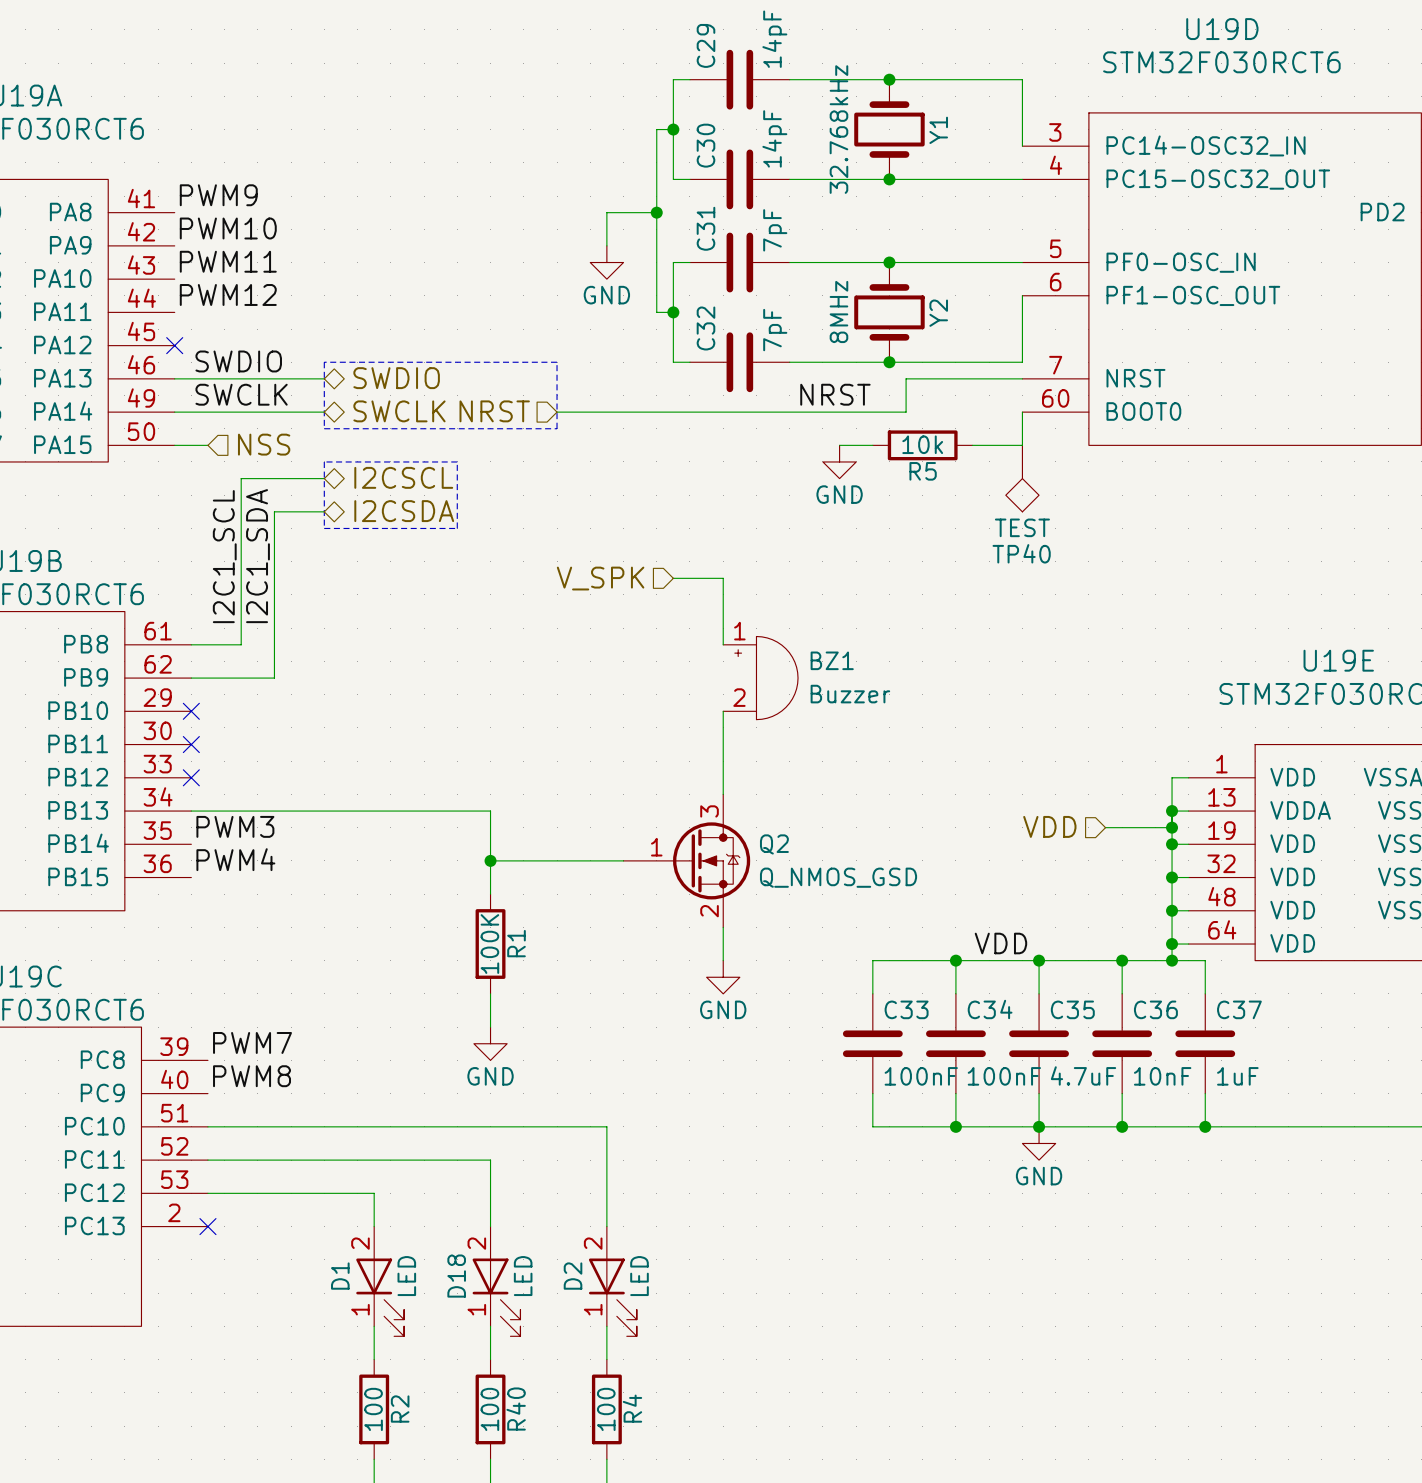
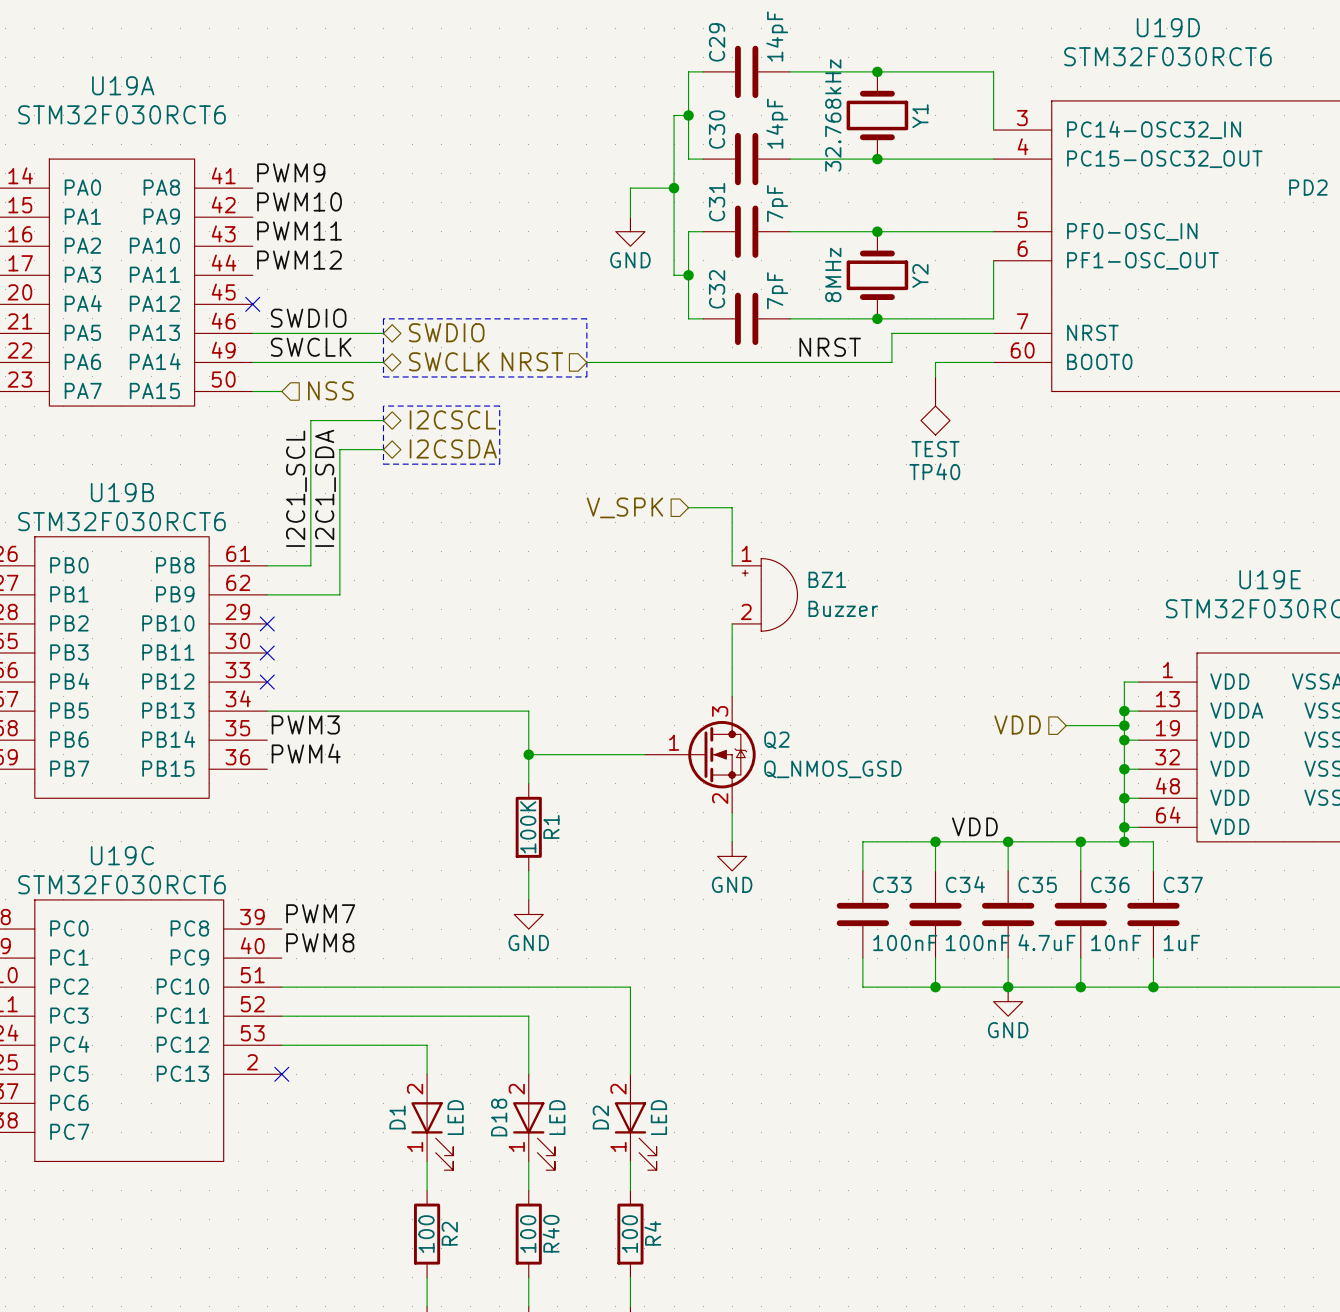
wire: (1022, 412) (1022, 445) (972, 445) -> (993, 362) (935, 362) (935, 376)
wire: (839, 445) (872, 445) -> none
R5: 10k (922, 445) -> none
power symbol: GND (839, 461) -> none
TP40 position: (1022, 478) -> (935, 406)

